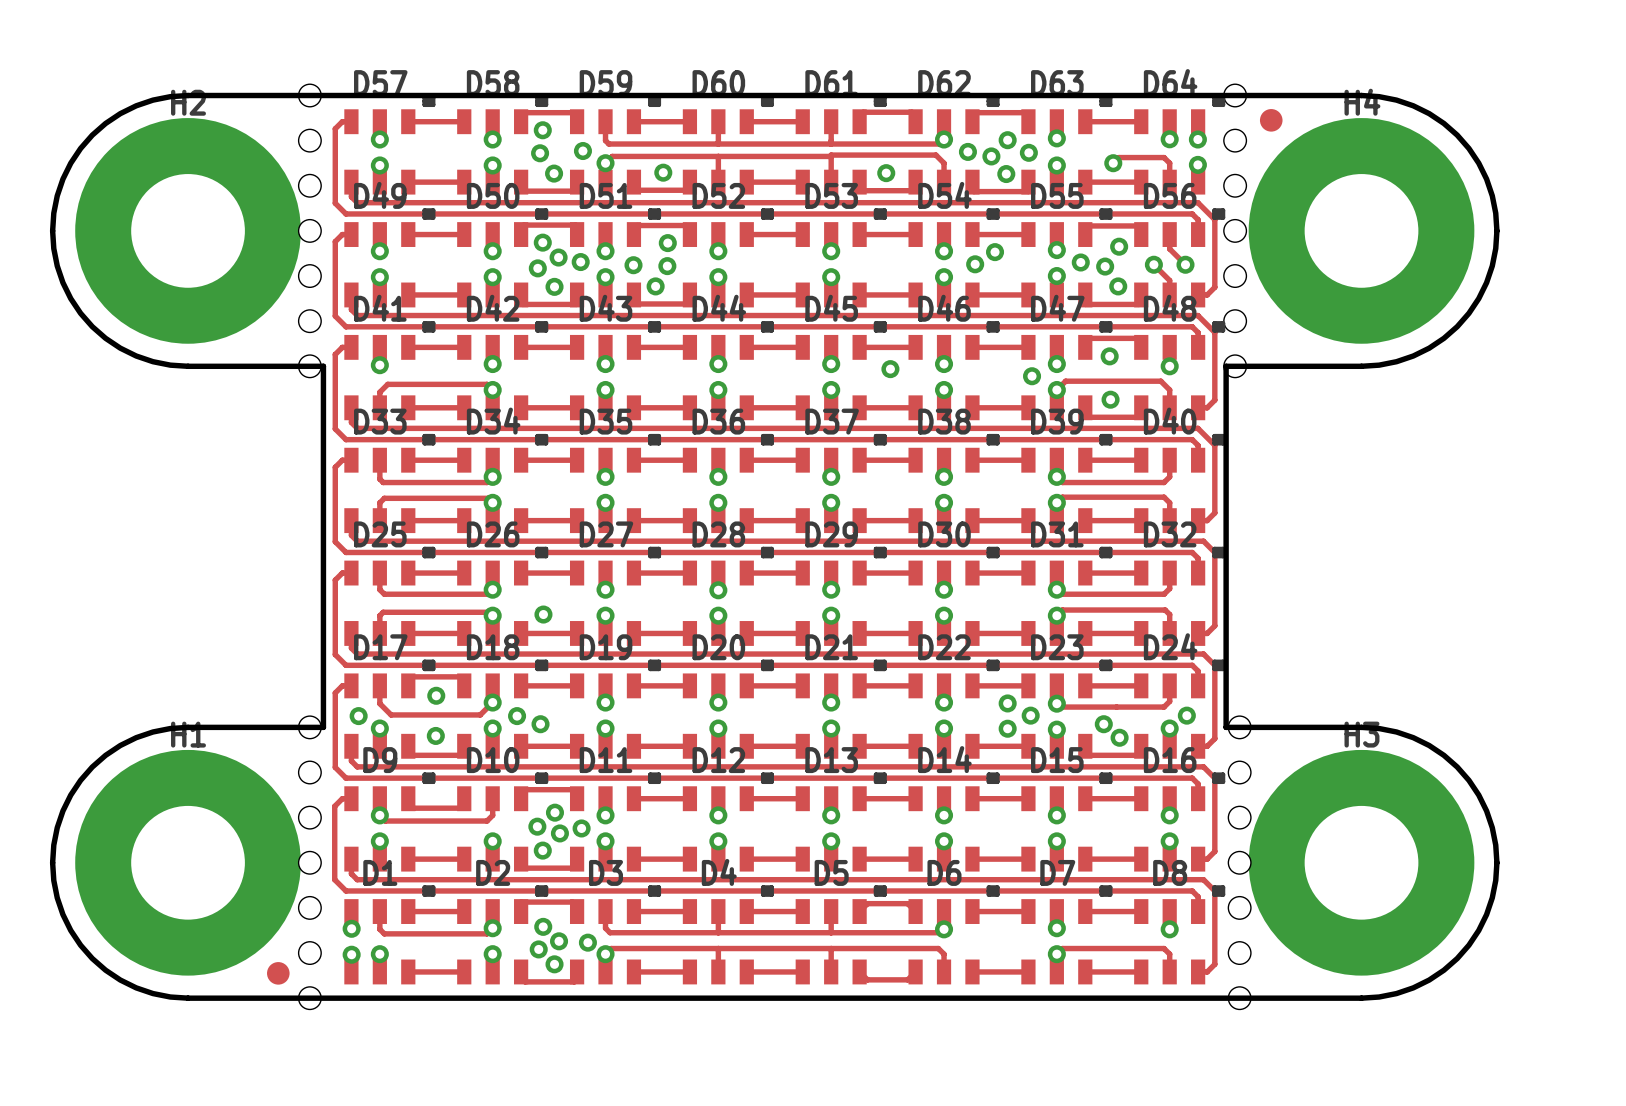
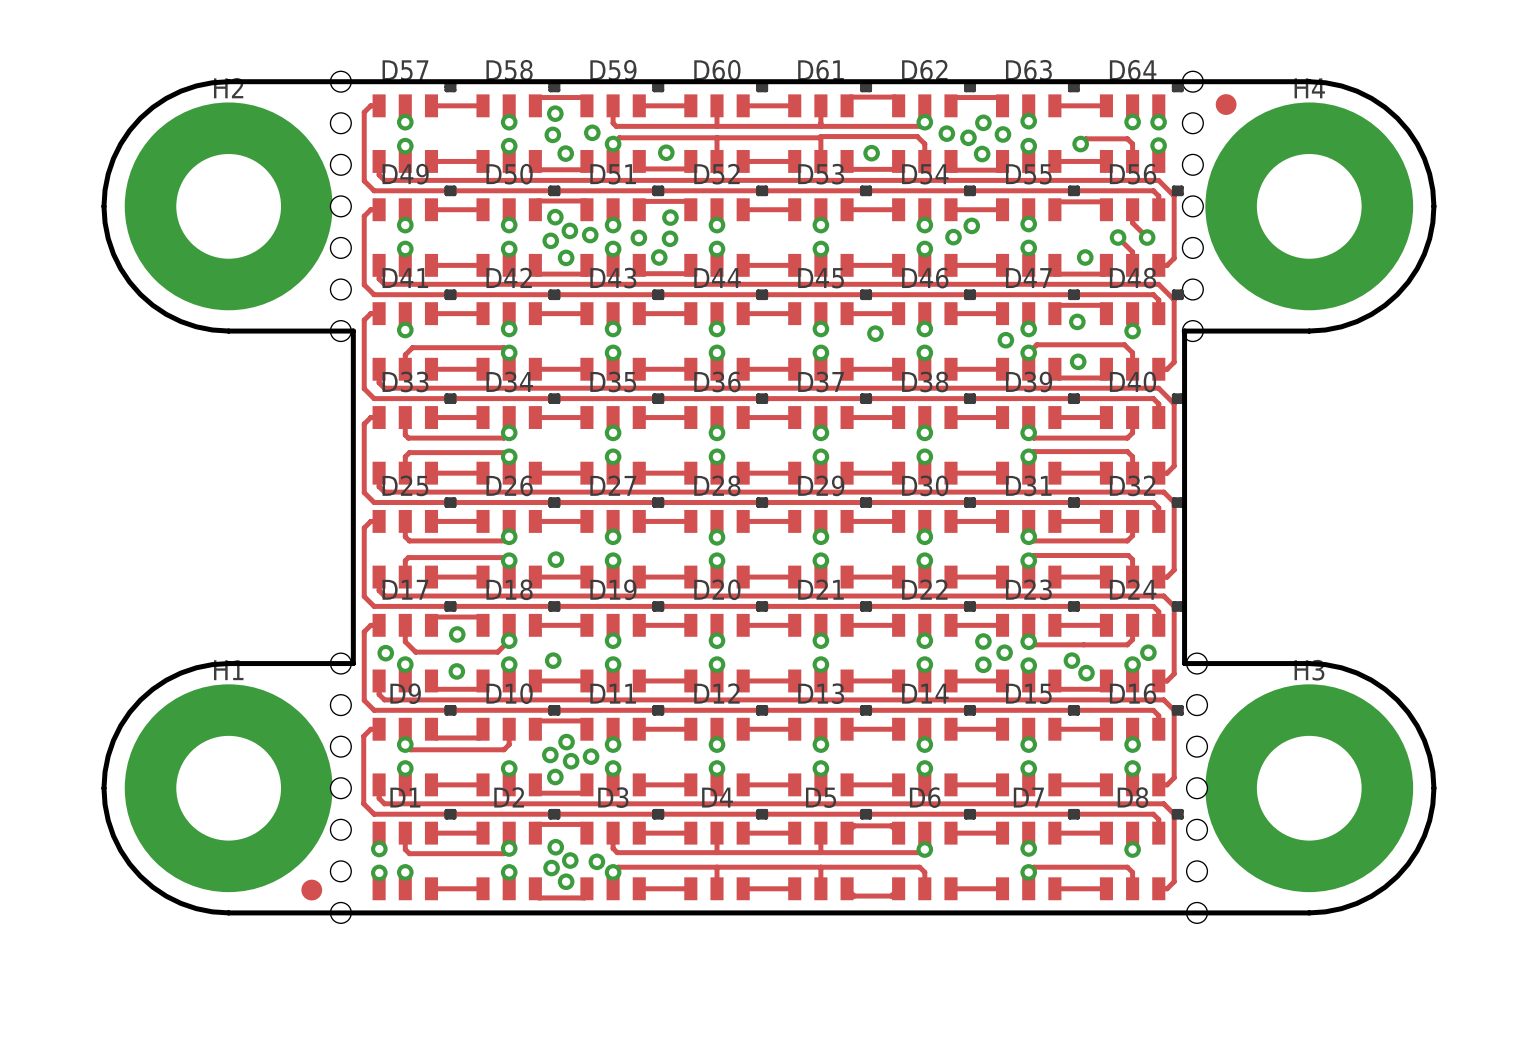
via: (1119, 246) -> none
via: (1080, 262) -> none
via: (1105, 266) -> none
via: (517, 716) -> none

